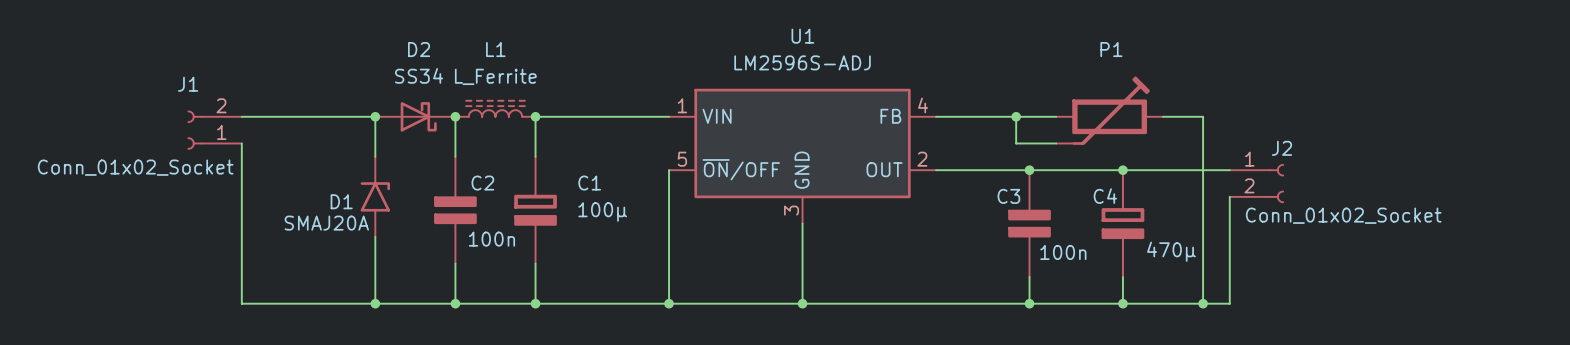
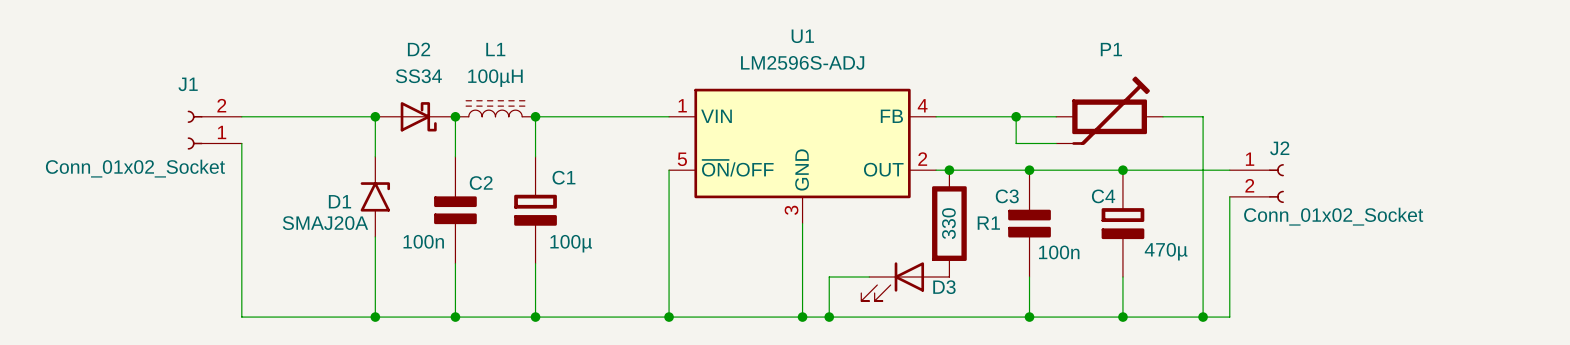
L1 value: L_Ferrite (495, 76) -> 100µH (495, 78)
junction: none -> (949, 170)
C1 name position: C1 (589, 183) -> C1 (563, 177)
C1 value position: 100µ (602, 211) -> 100µ (571, 243)
R1: none -> 330 (949, 223)
C2 value position: 100n (491, 239) -> 100n (423, 241)
wire: none -> (869, 277) (829, 277) (829, 317)
D3: none -> (905, 281)
wire: (241, 303) (1229, 303) -> (241, 303) (241, 317) (1229, 317) (1229, 303)
wire: none -> (375, 303) (375, 317)
junction position: (375, 303) -> (375, 317)
wire: none -> (455, 303) (455, 317)
junction position: (455, 303) -> (455, 317)
wire: none -> (535, 303) (535, 317)
junction position: (535, 303) -> (535, 317)
wire: none -> (669, 303) (669, 317)
junction position: (669, 303) -> (669, 317)
wire: none -> (802, 303) (802, 317)
junction position: (802, 303) -> (802, 317)
wire: none -> (1029, 303) (1029, 317)
junction position: (1029, 303) -> (1029, 317)
wire: none -> (1122, 303) (1122, 317)
junction position: (1122, 303) -> (1122, 317)
wire: none -> (1203, 303) (1203, 317)
junction position: (1203, 303) -> (1203, 317)
junction: none -> (829, 317)

